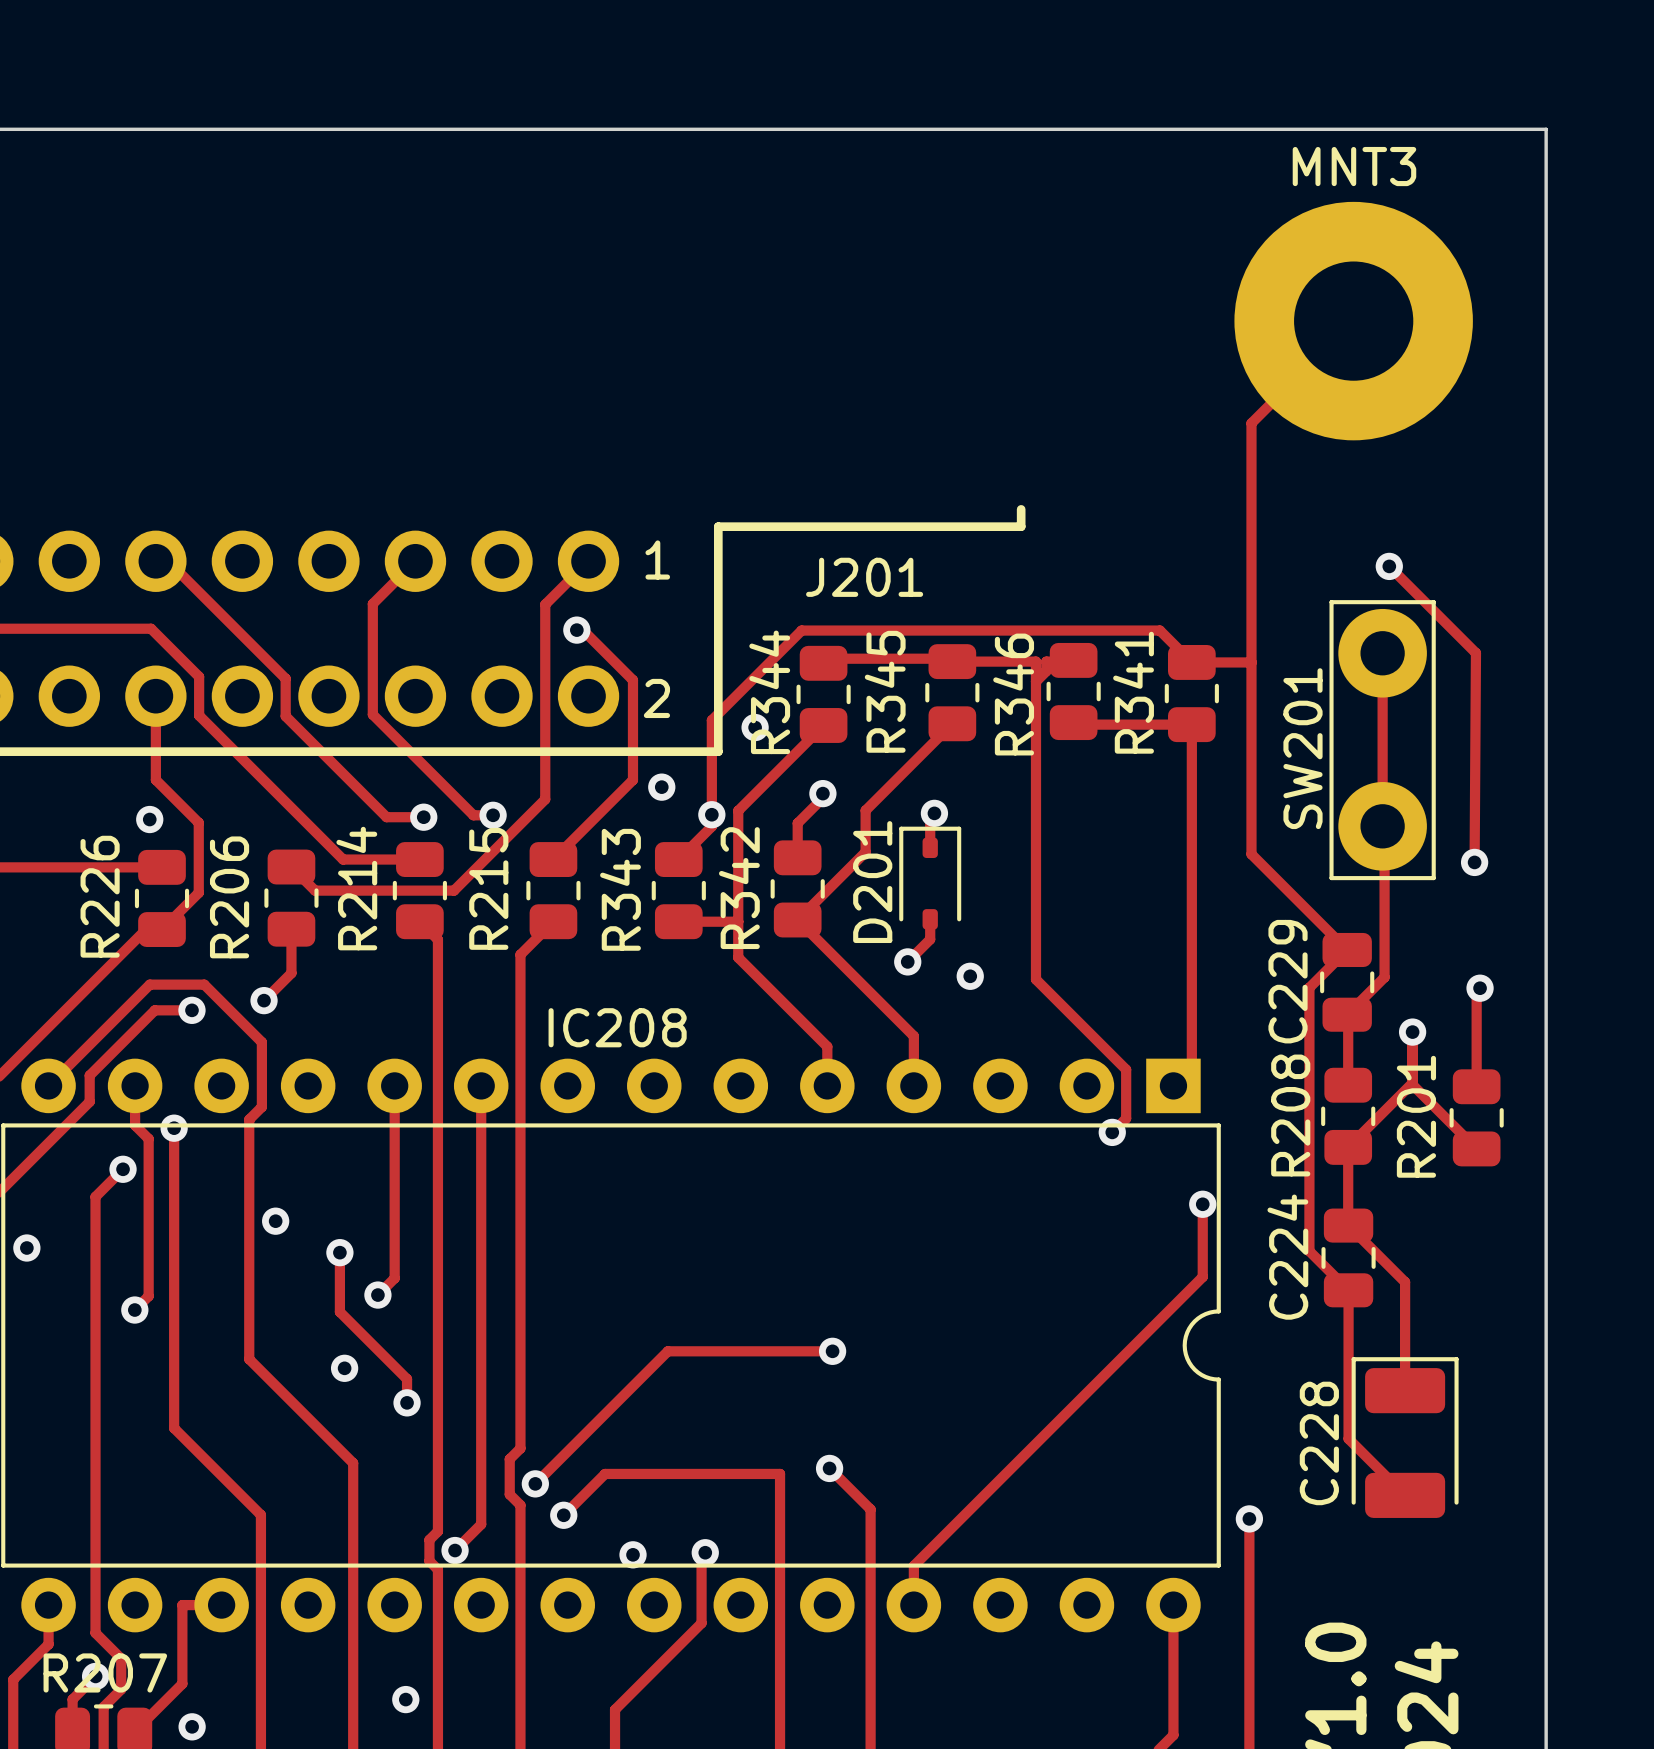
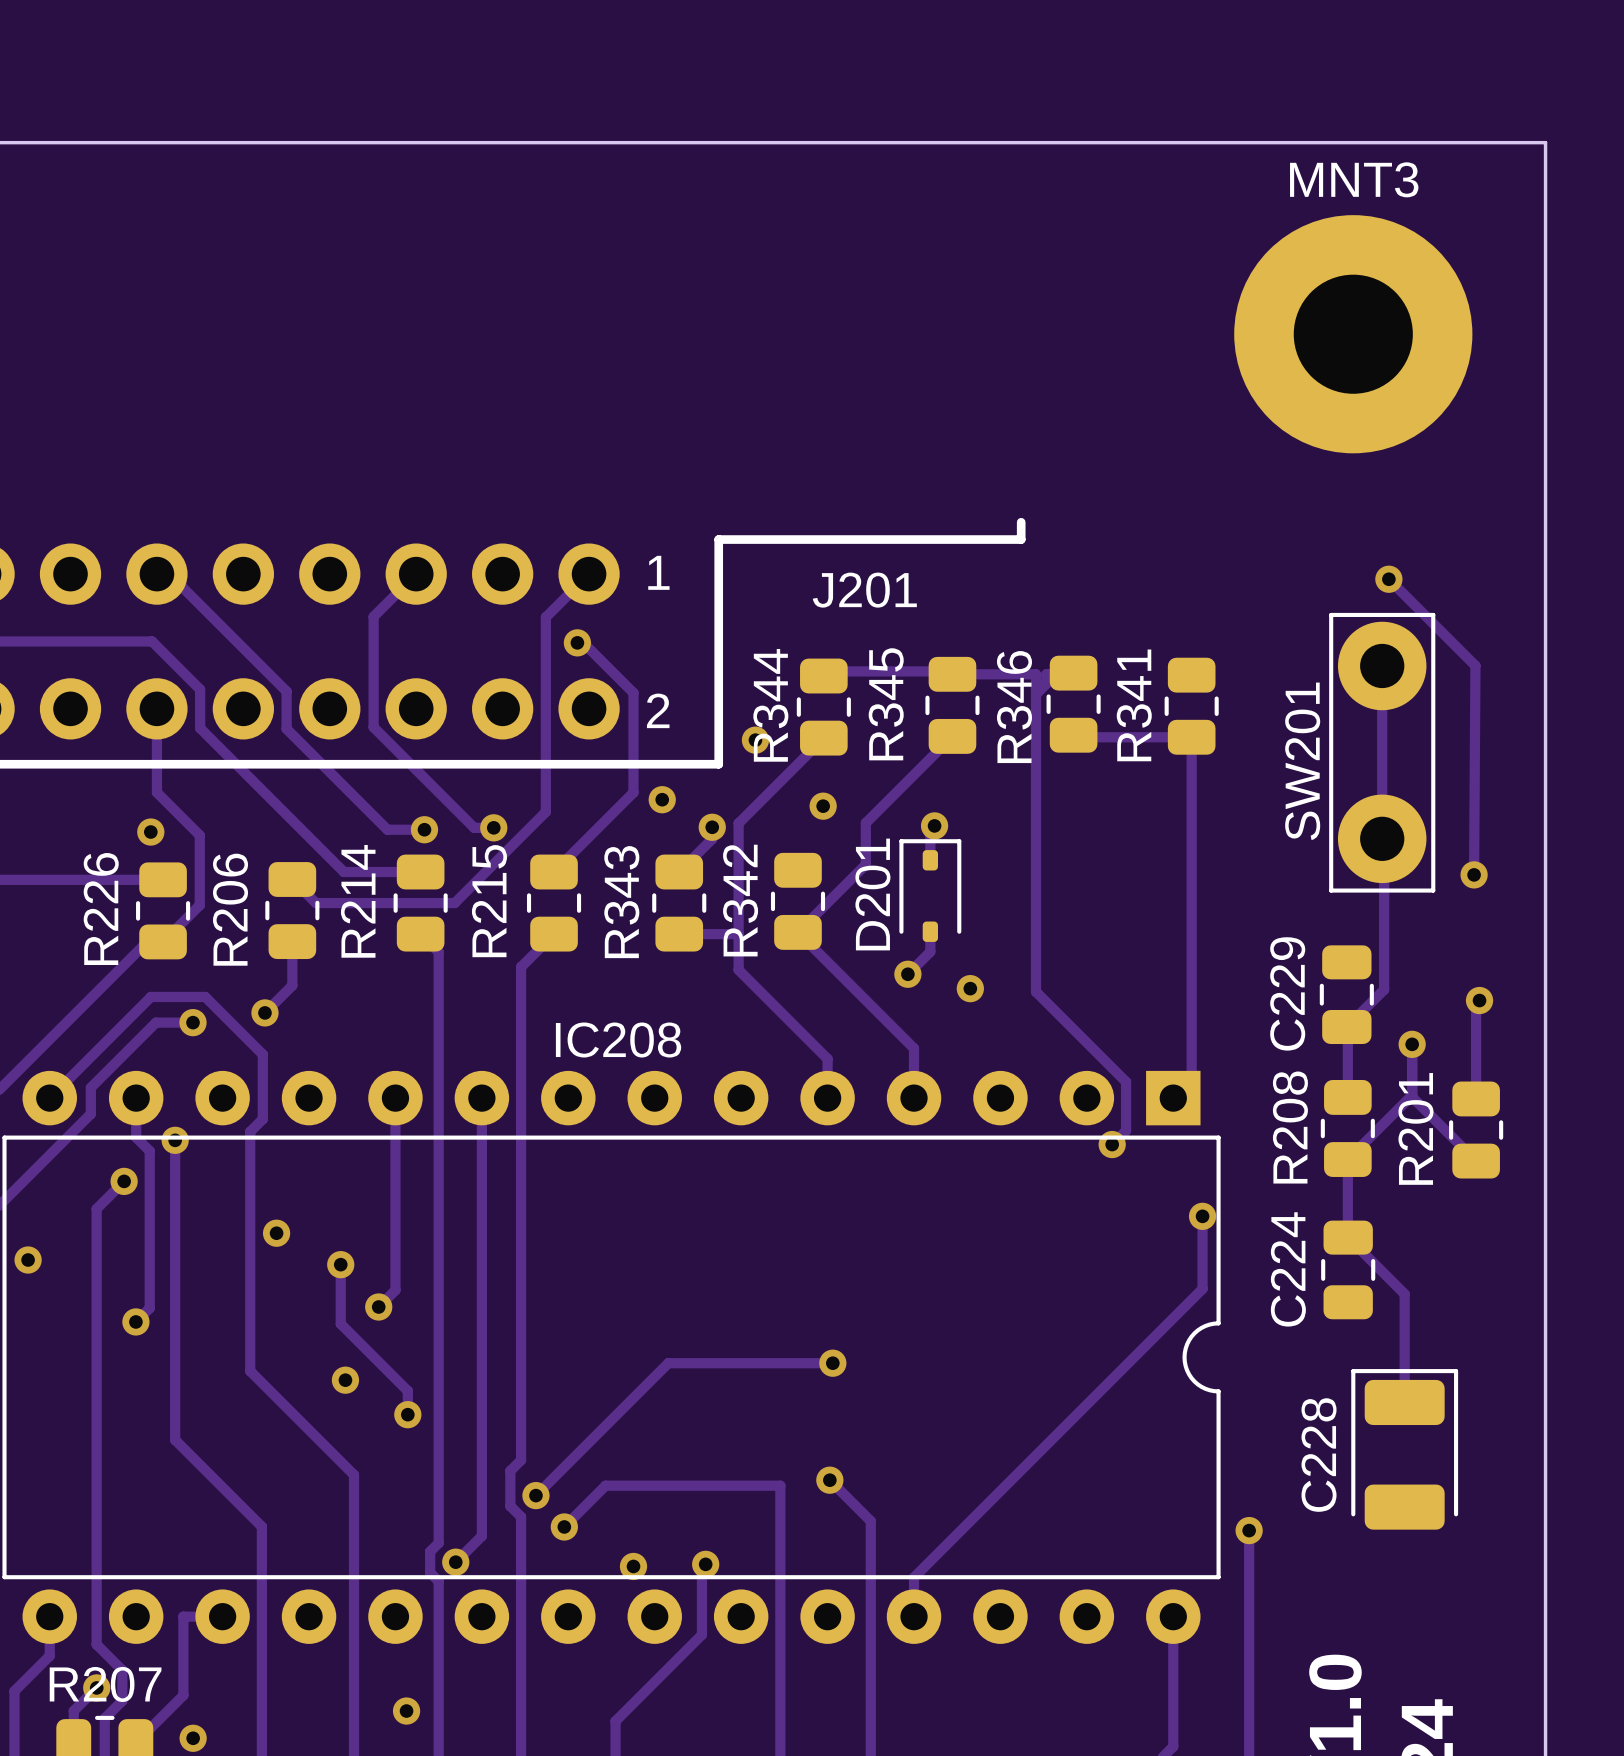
track: (1353, 321) (1251, 423) (1251, 854) (1347, 949) (1309, 987) (1309, 1251) (1348, 1290) (1348, 1438) (1405, 1495) -> none
track: (1251, 662) (1191, 662) (1159, 630) (801, 630) (711, 720) (711, 814) -> none
track: (823, 797) (827, 793) (822, 793) (822, 798) (797, 823) (797, 857) -> none

